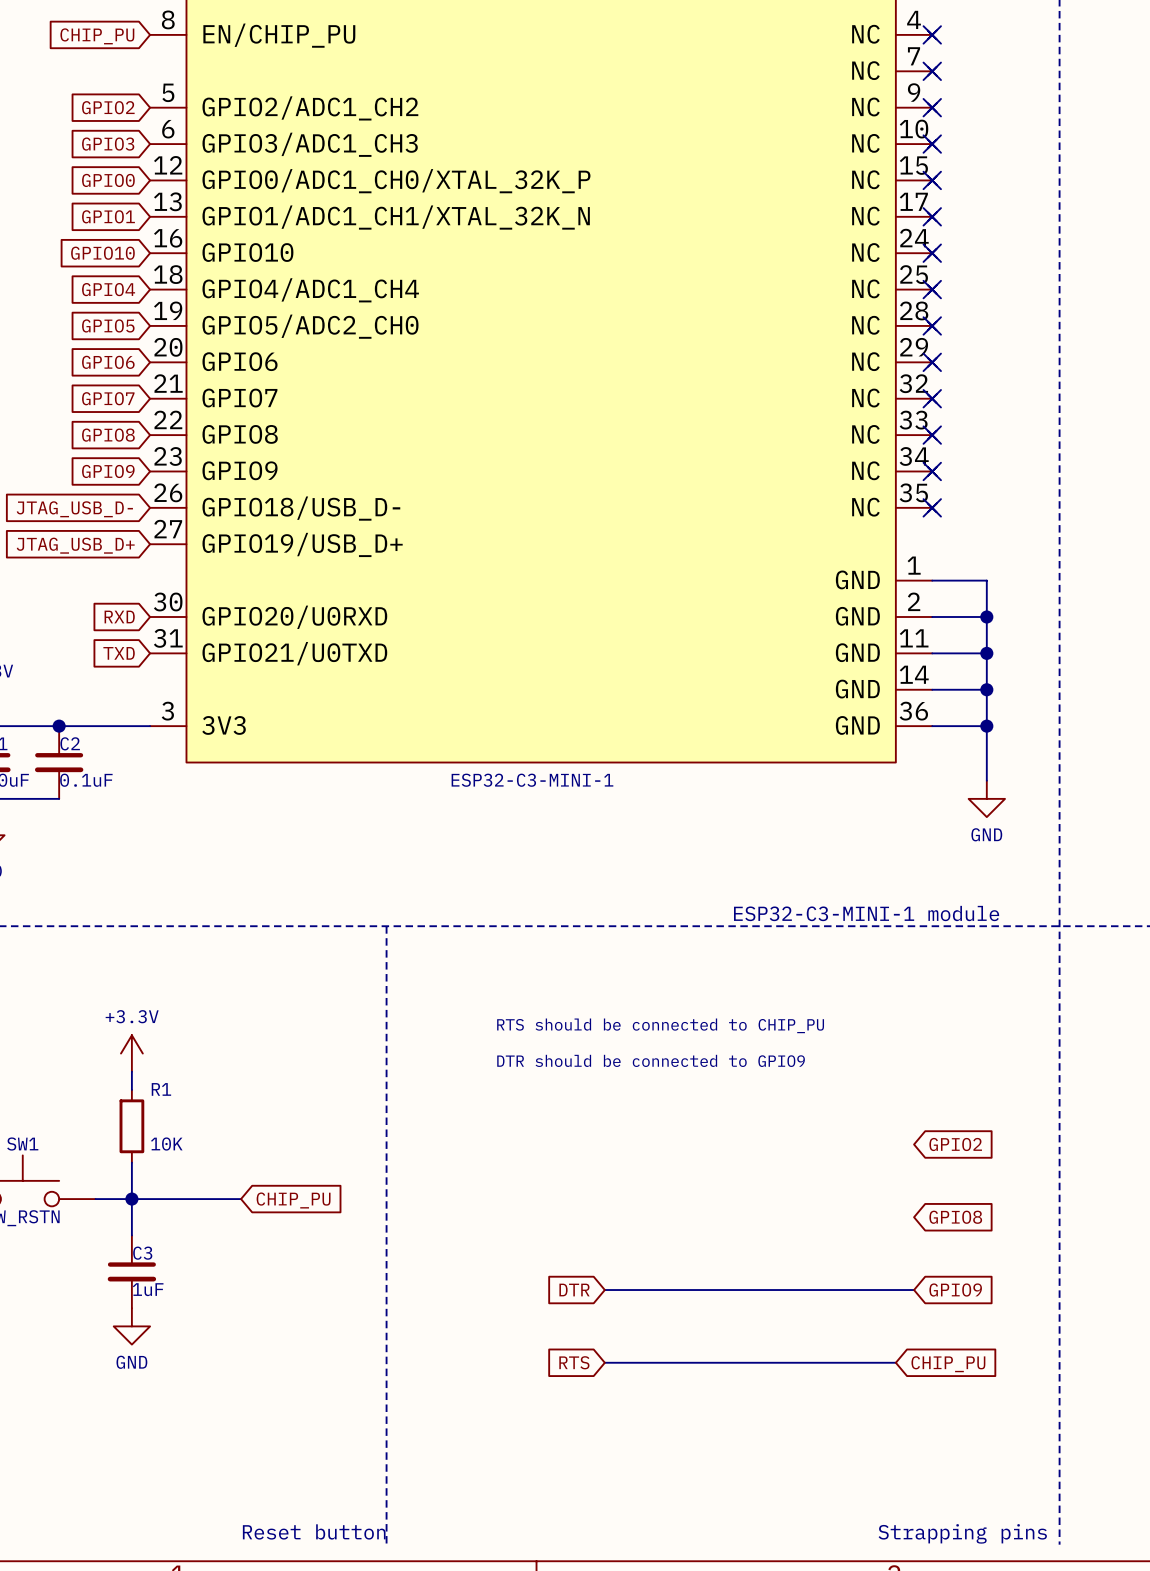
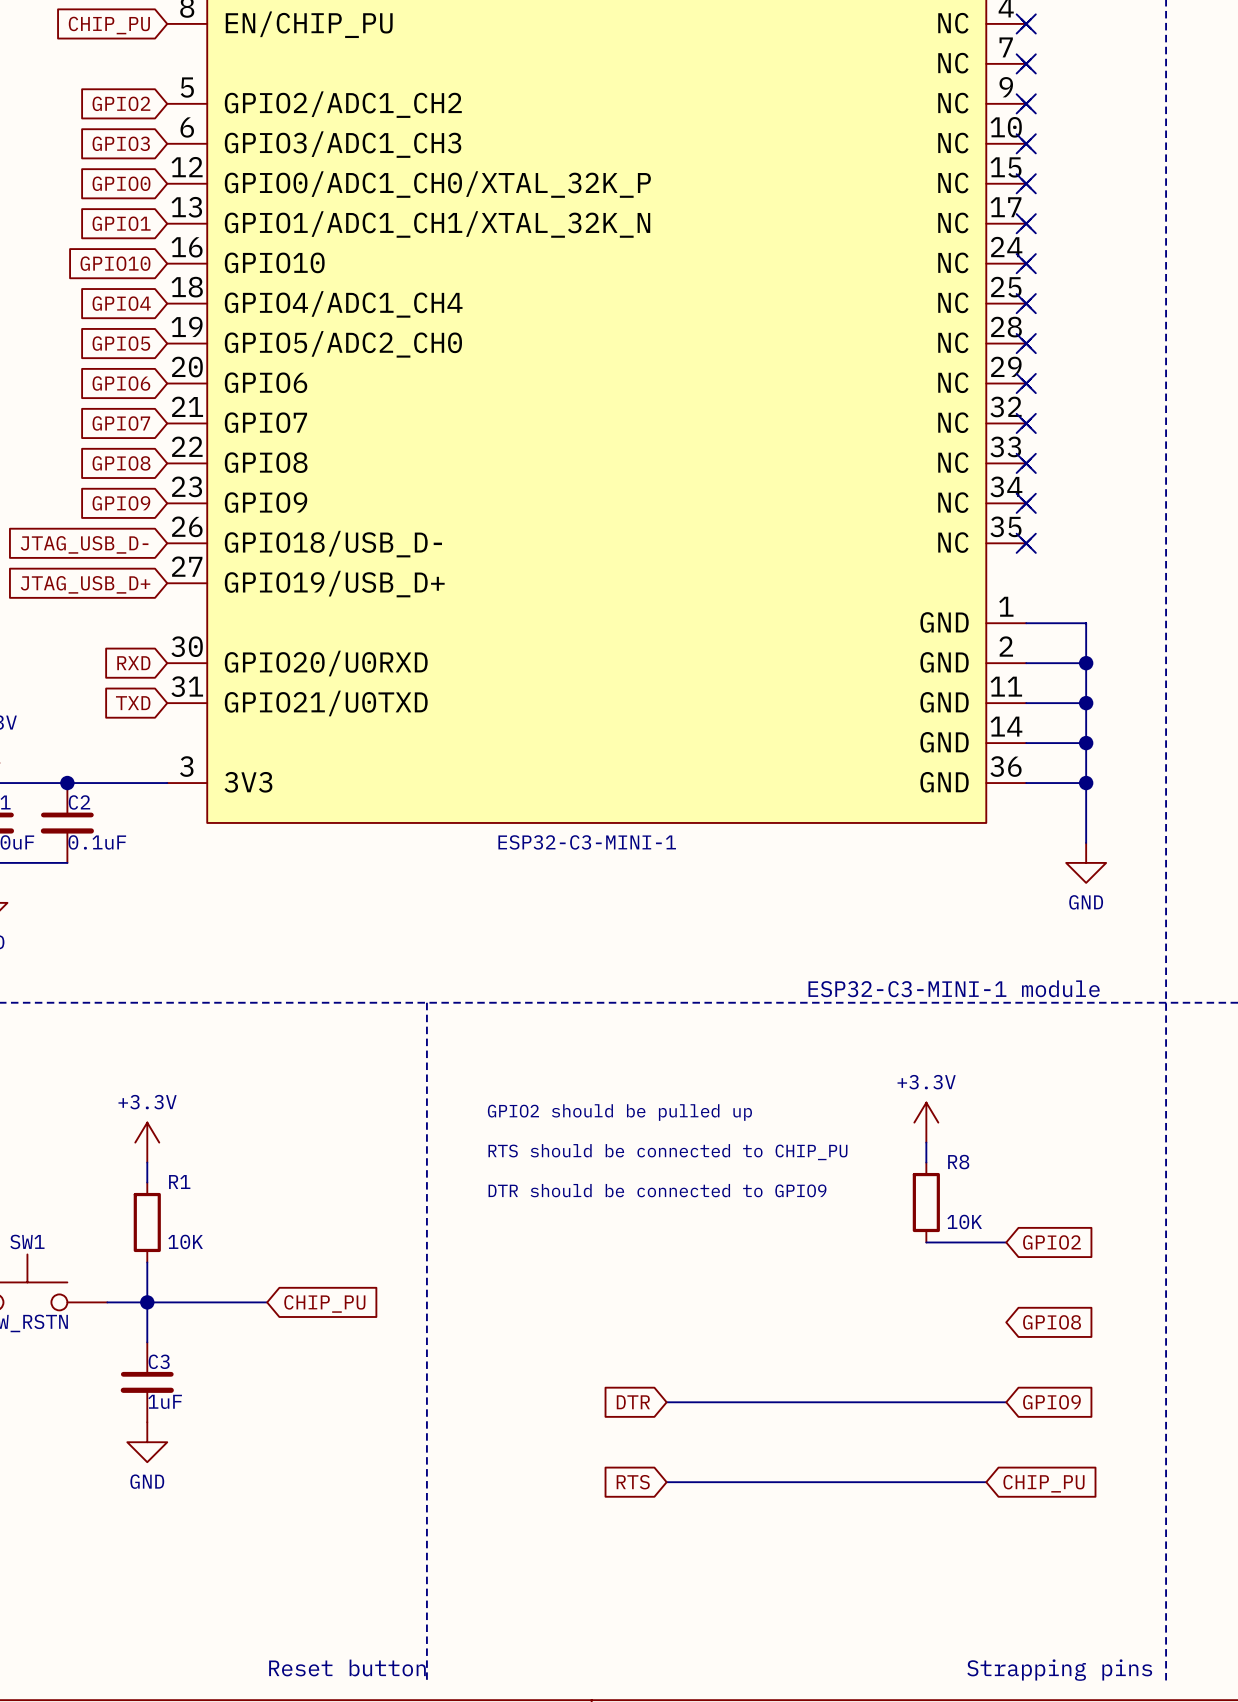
text position: RTS should be connected to CHIP_PU (660, 1025) -> RTS should be connected to CHIP_PU (667, 1152)
text: none -> GPIO2 should be pulled up (619, 1112)
power symbol: none -> +3.3V (926, 1122)
wire: none -> (926, 1142) (926, 1162)
text position: DTR should be connected to GPIO9 (651, 1060) -> DTR should be connected to GPIO9 (657, 1190)
R8: none -> 10K (926, 1202)
wire: none -> (926, 1242) (1006, 1242)

